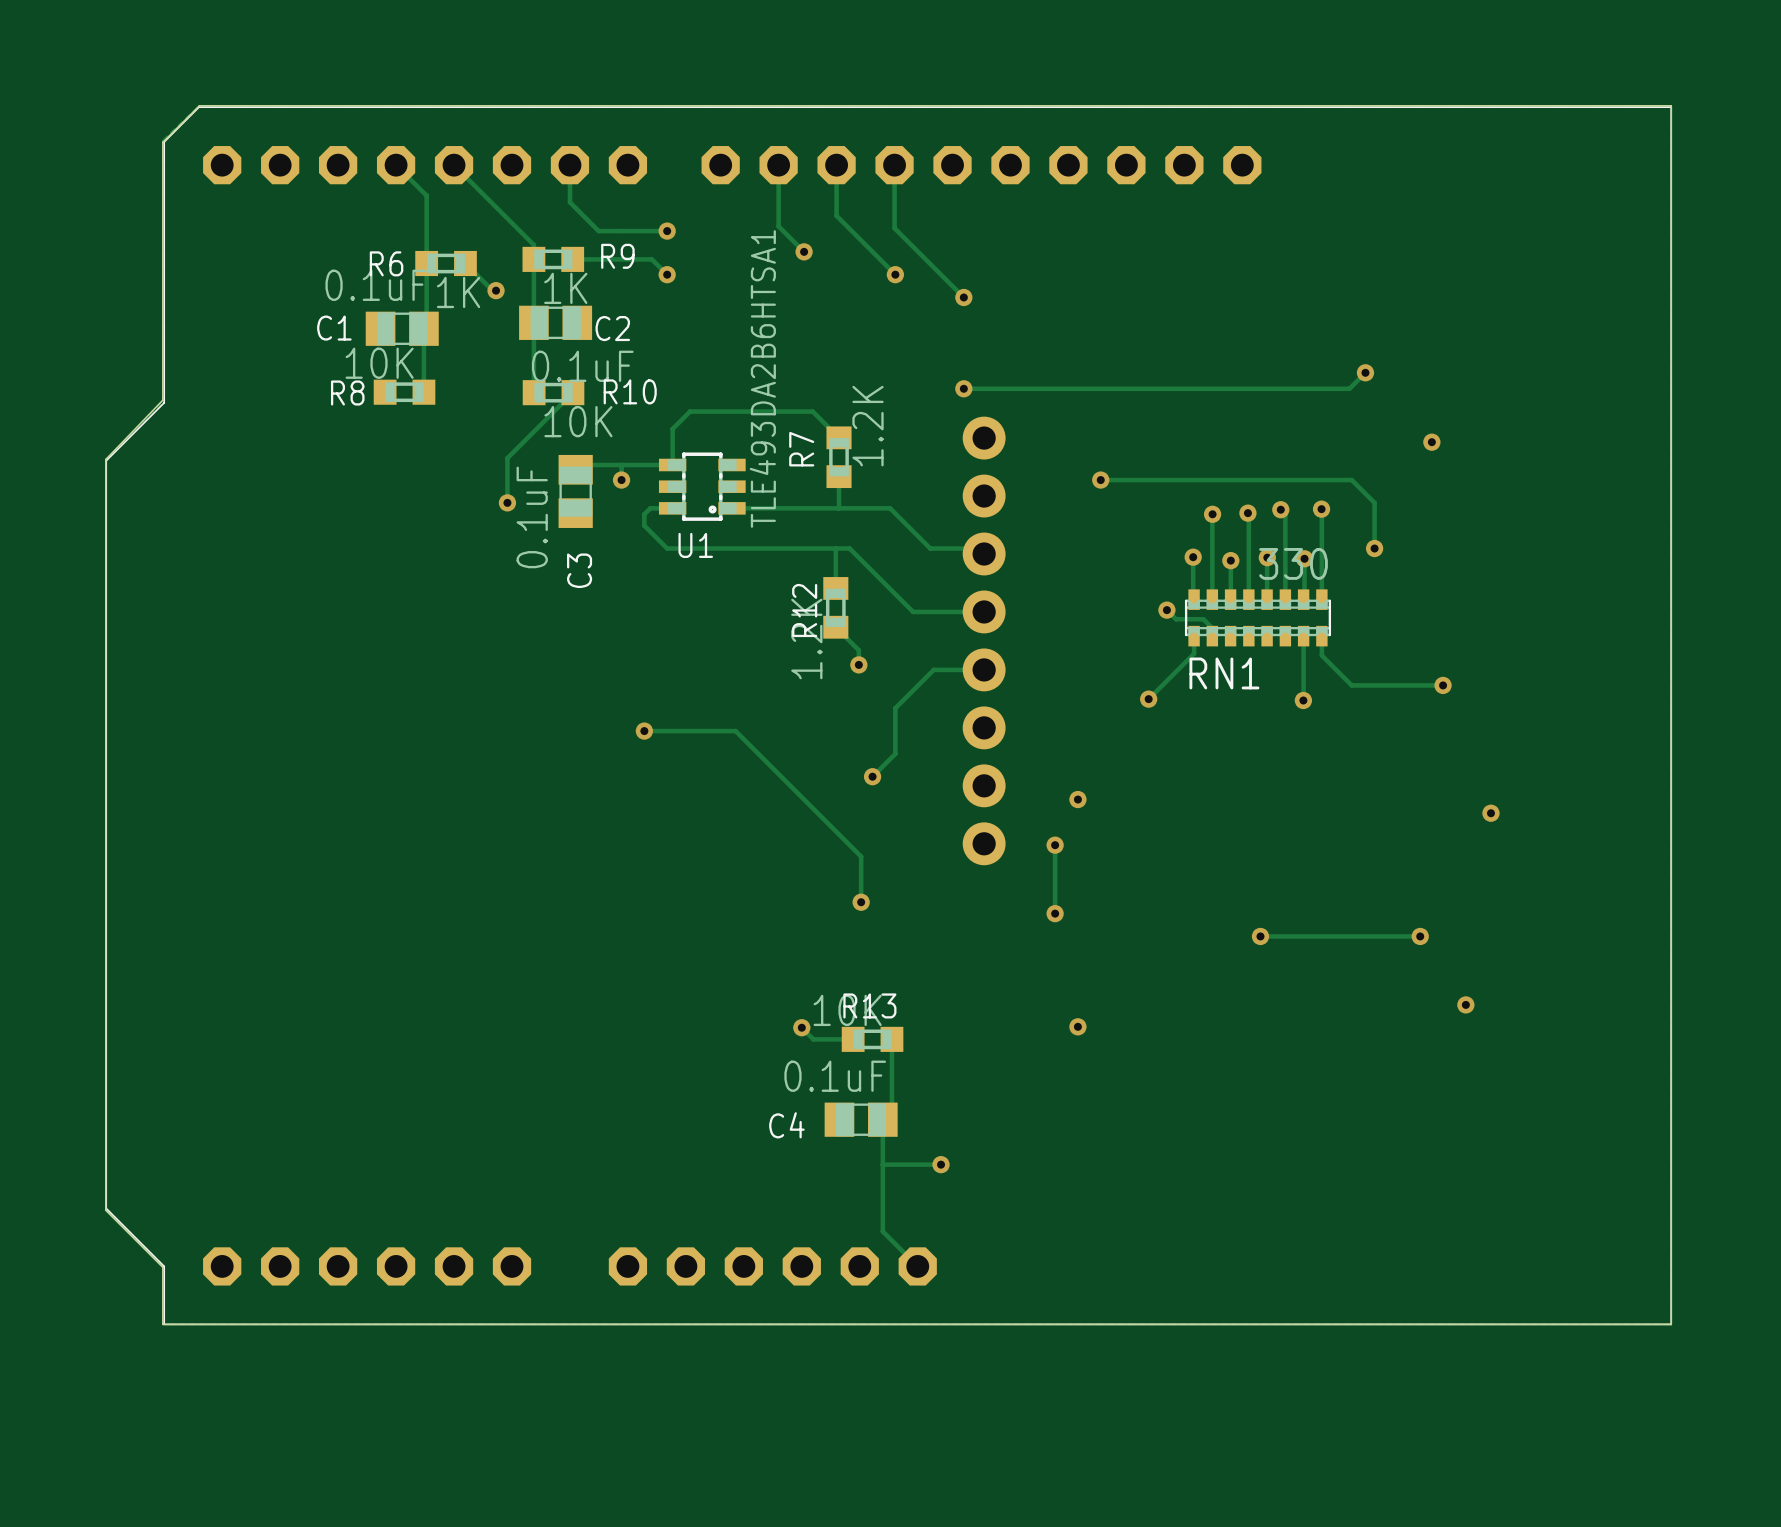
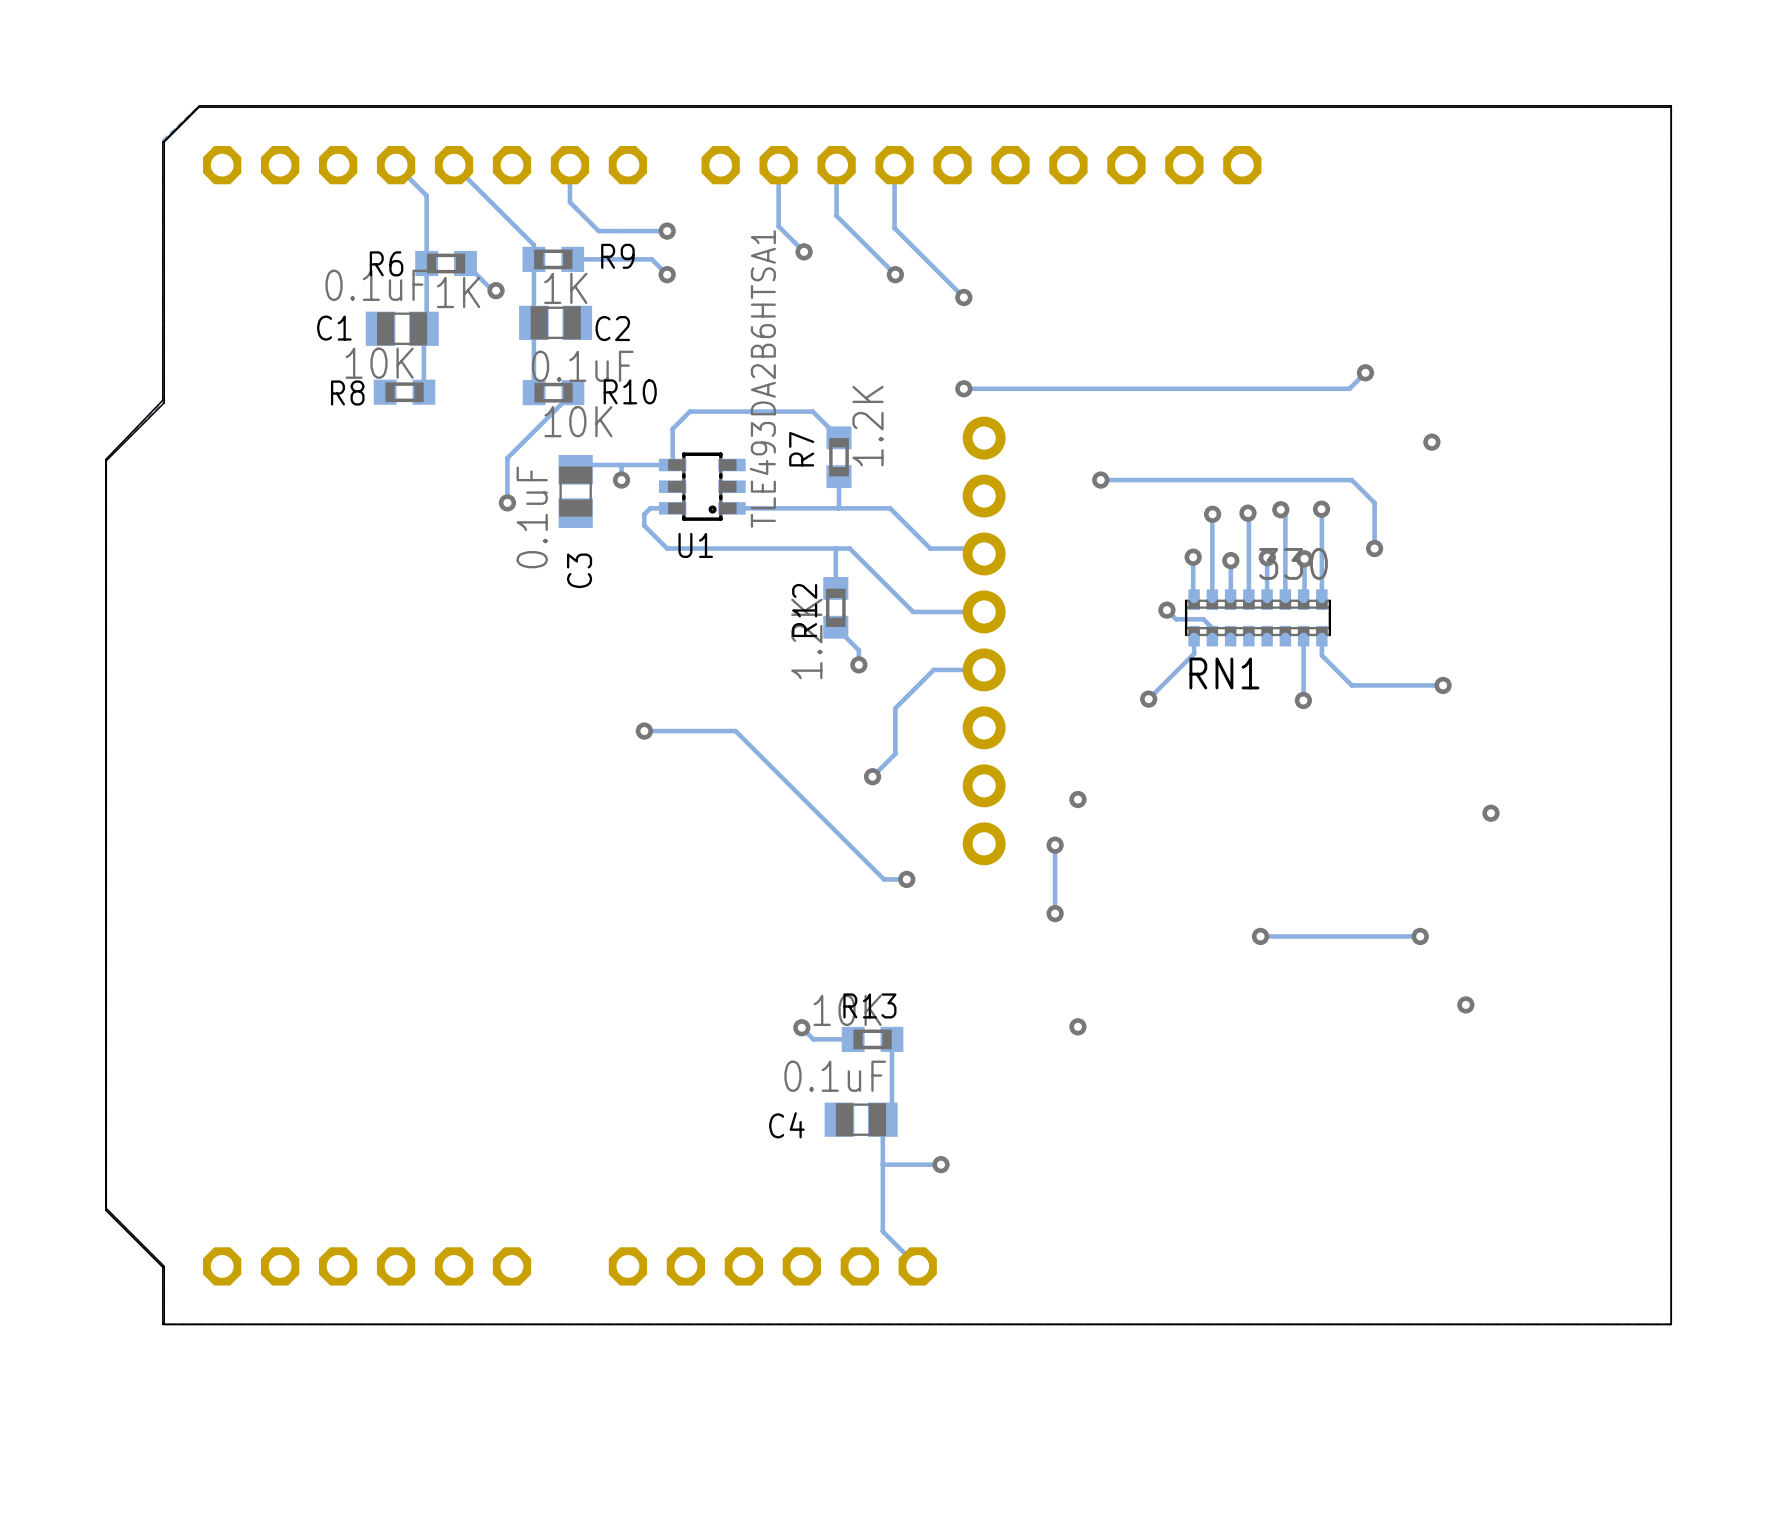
track: (861, 856) (861, 902) -> (861, 856) (883, 879) (906, 879)
via position: (861, 902) -> (906, 879)

